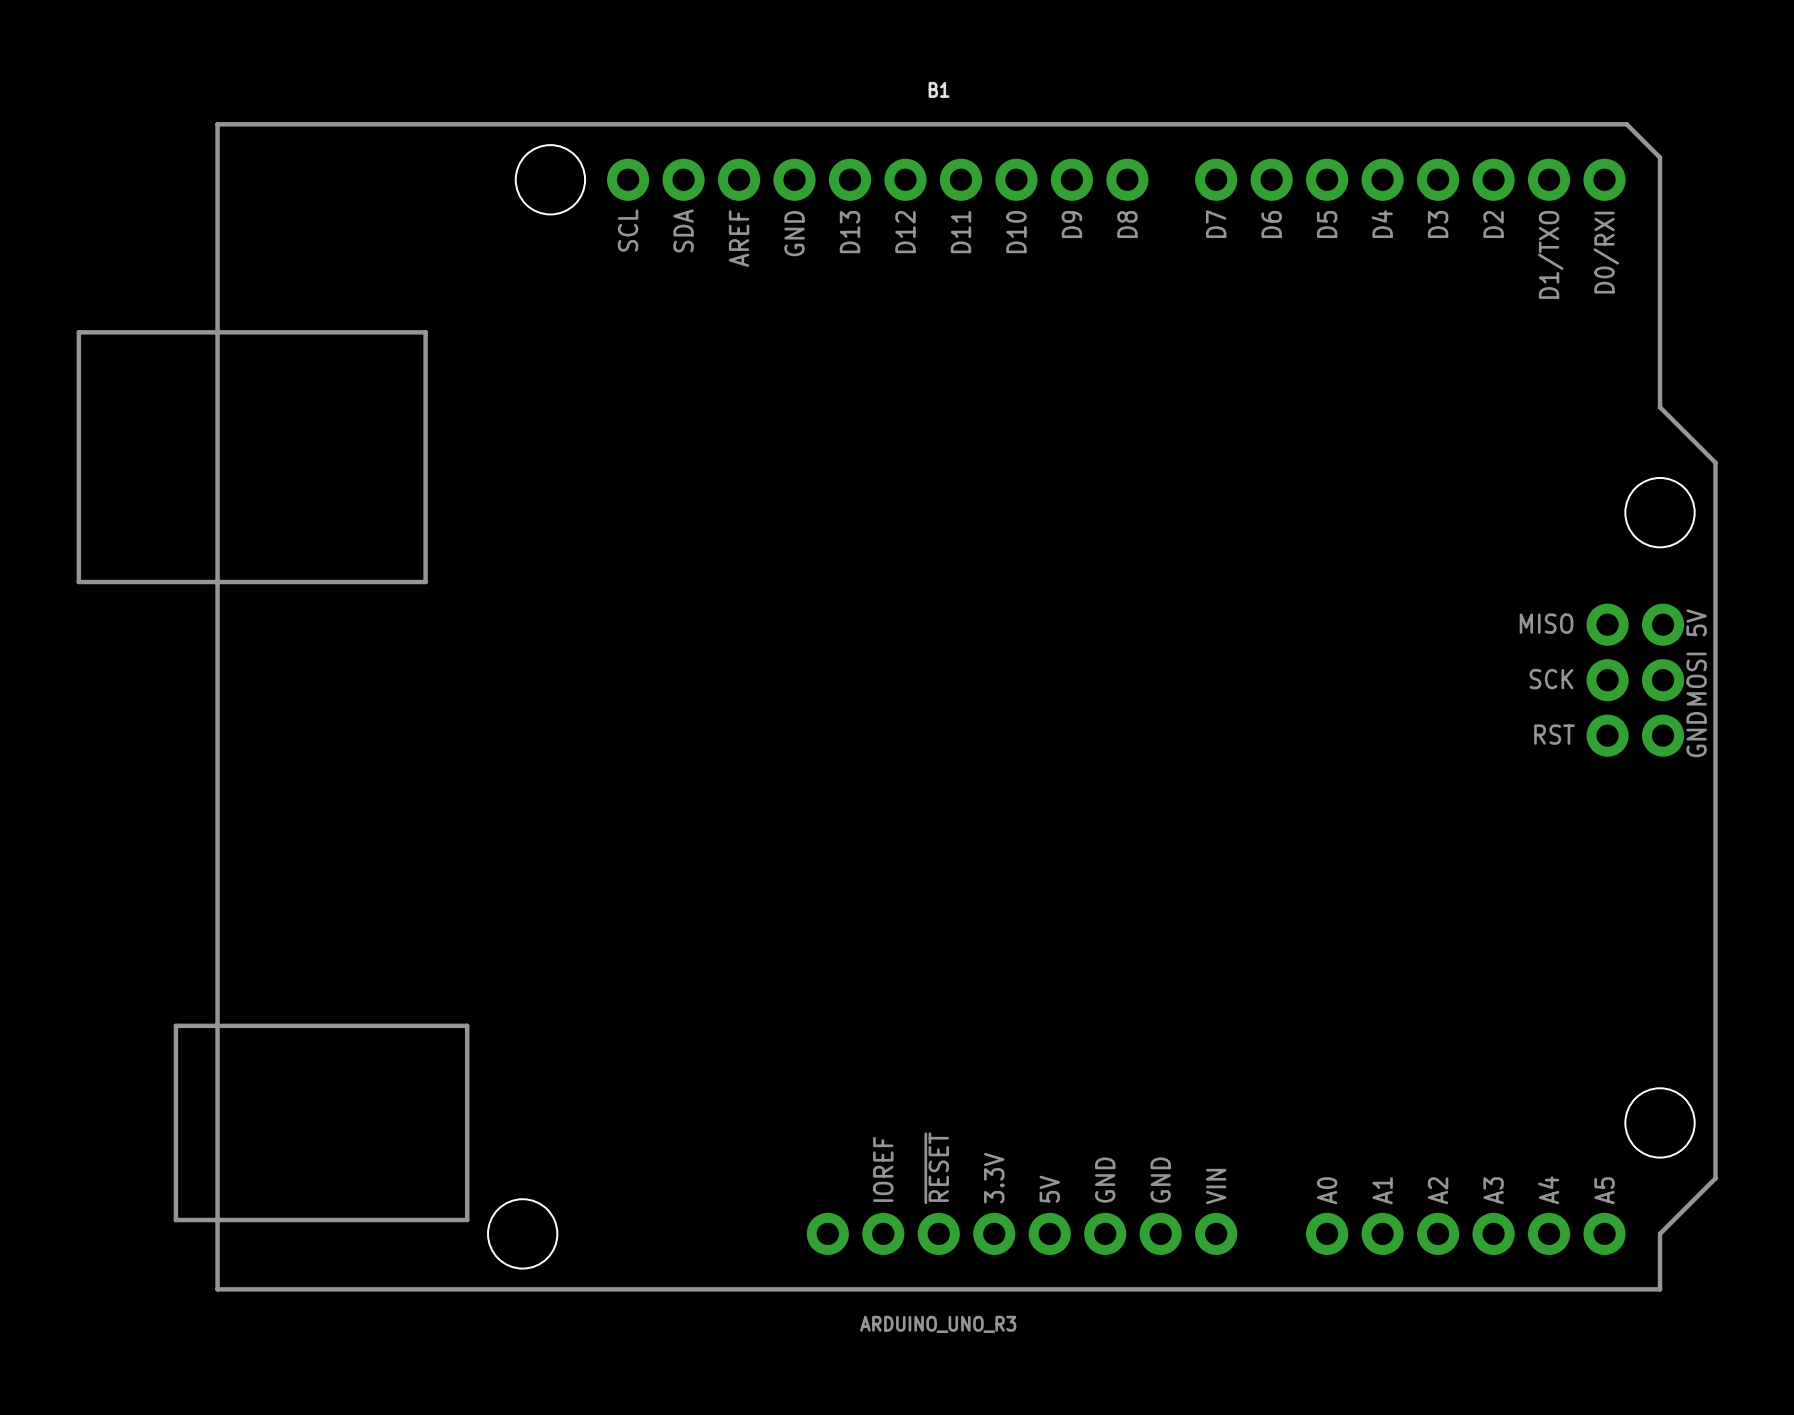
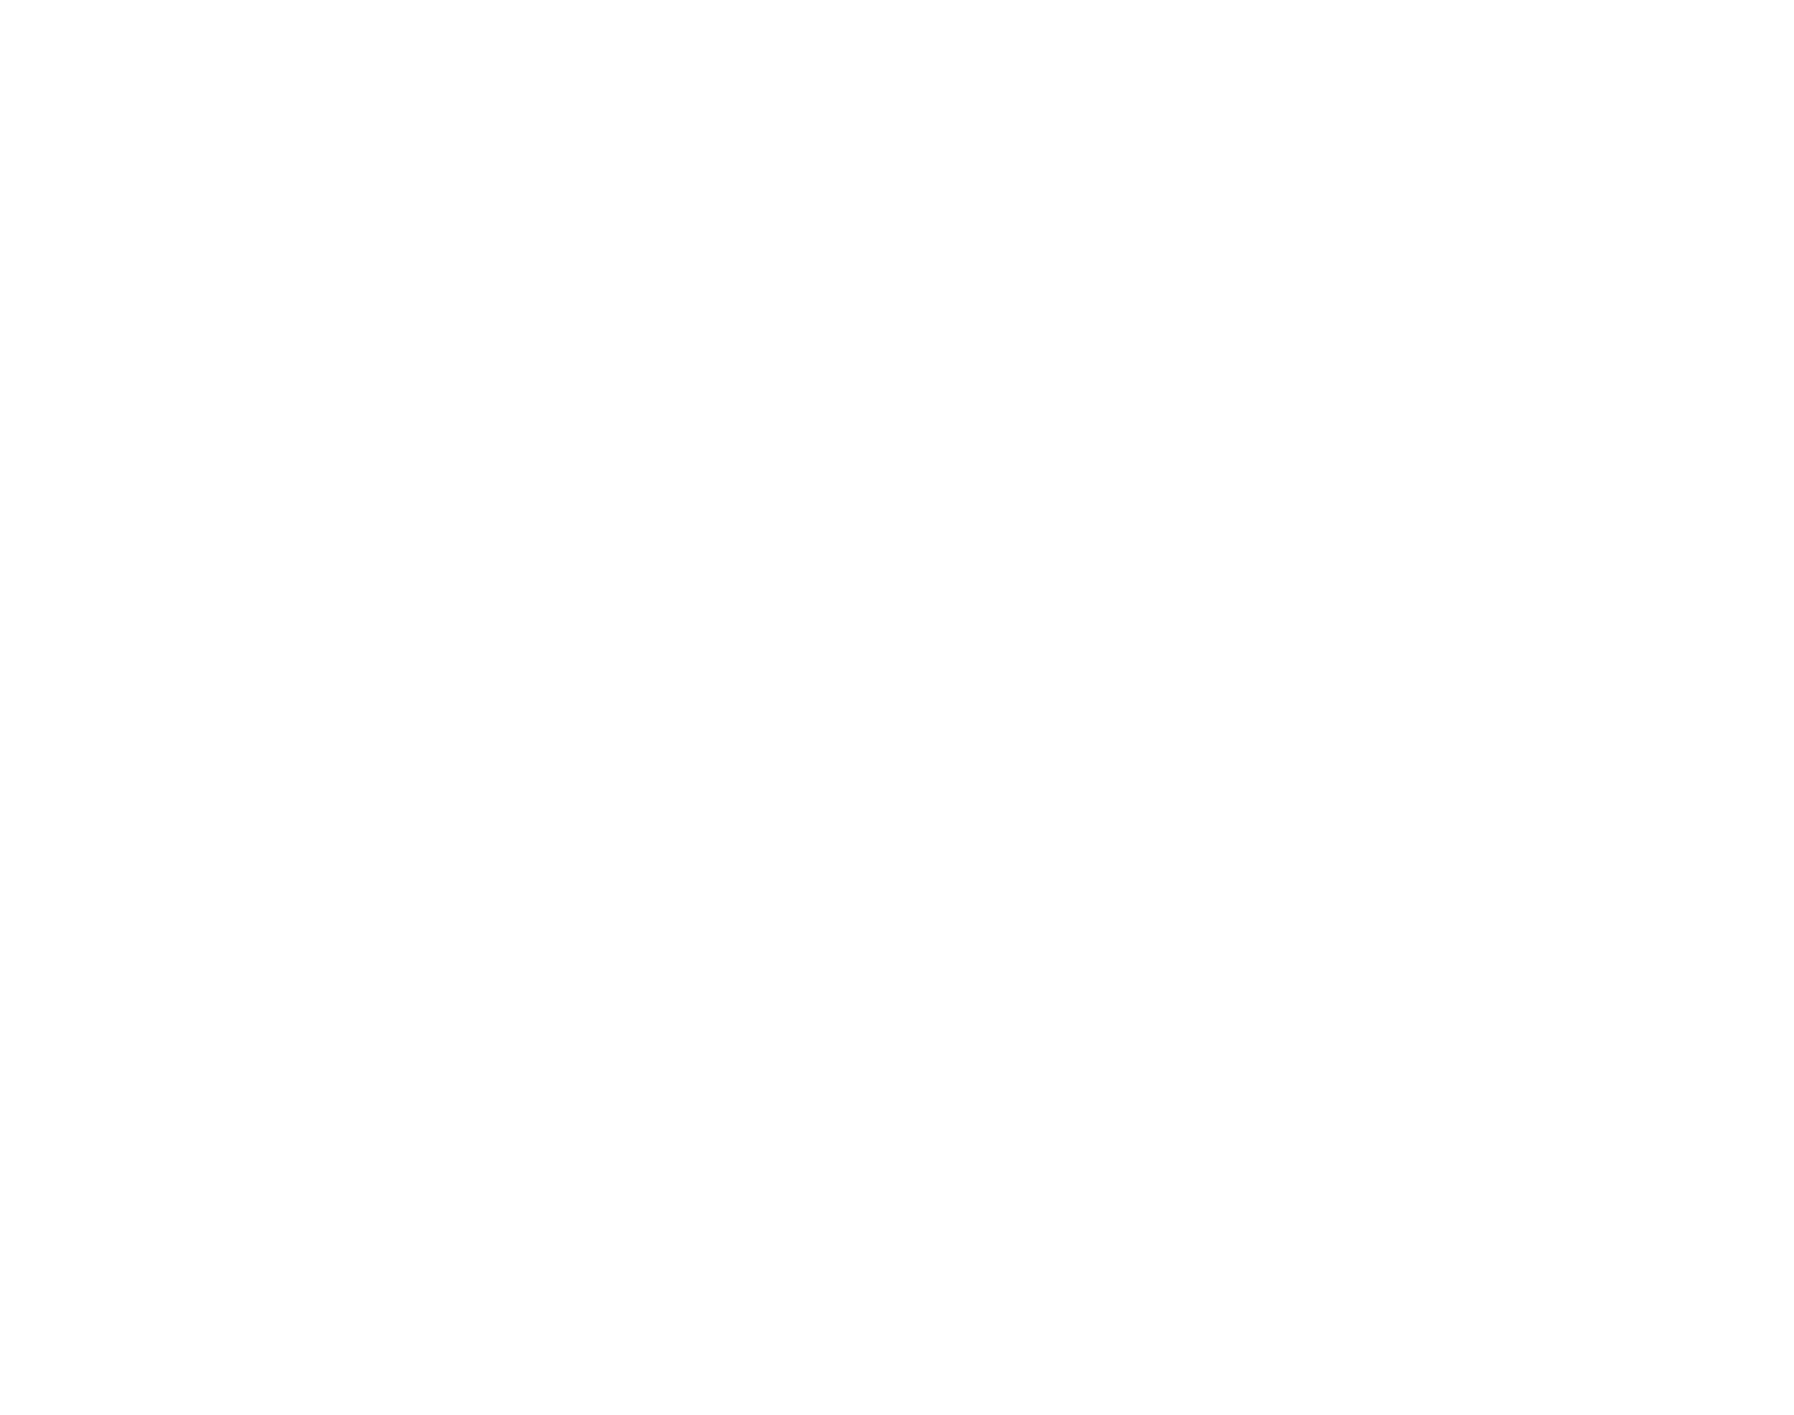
B1: ARDUINO_UNO_R3 (897, 706) -> none

